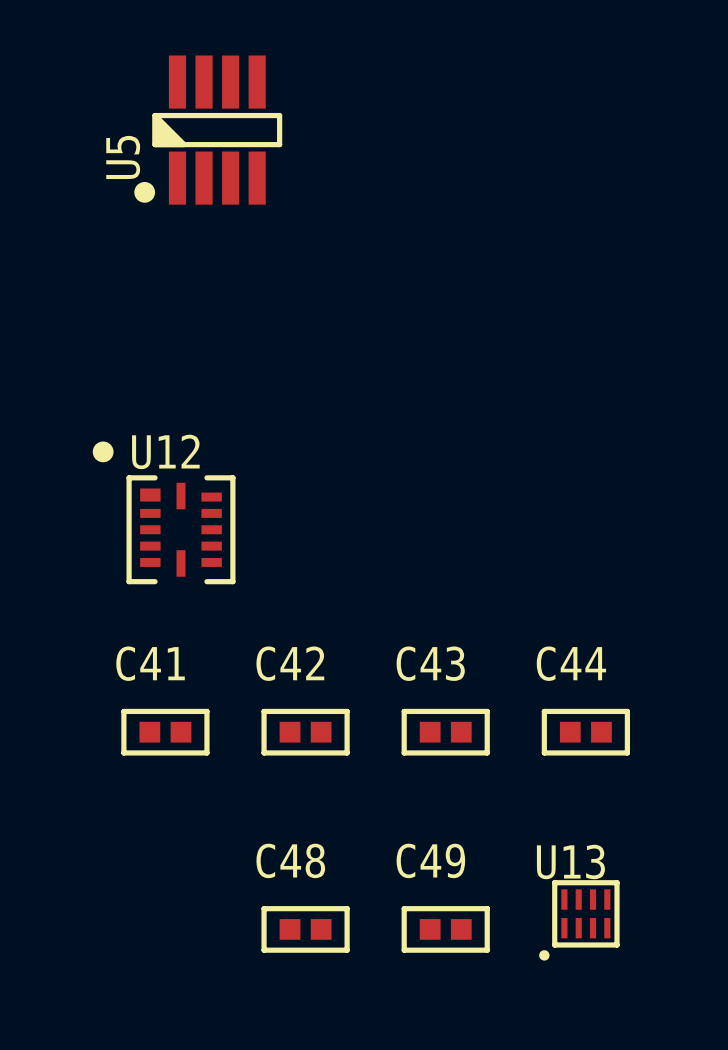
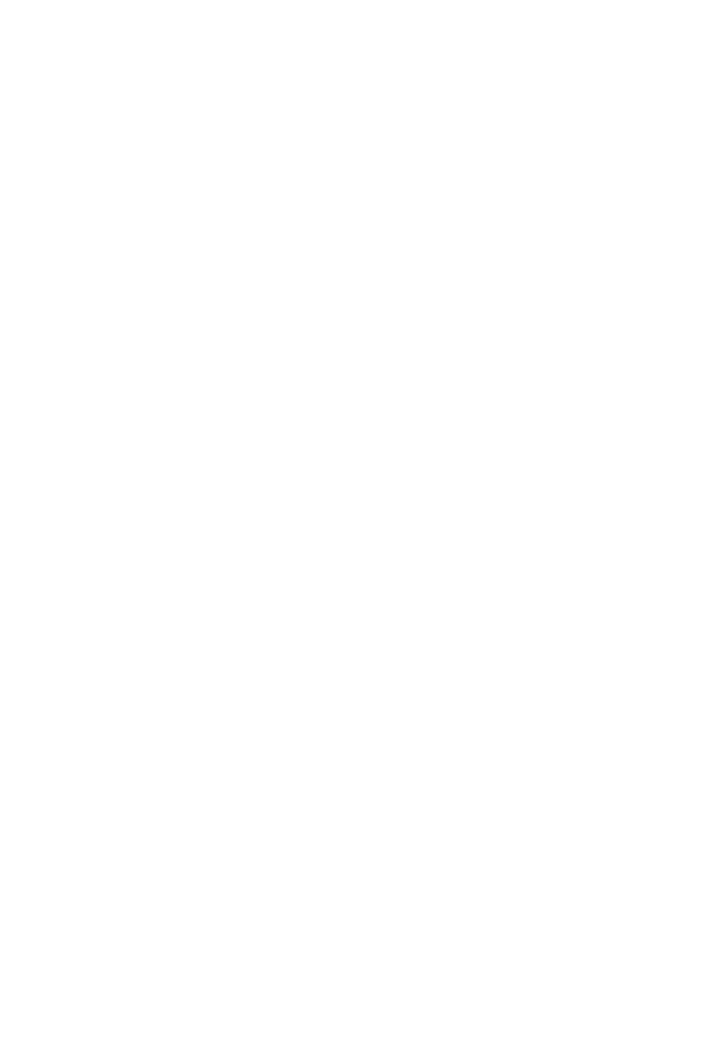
U5: (208, 130) -> none
U12: (164, 512) -> none
C41: (165, 732) -> none
C42: (305, 732) -> none
C43: (445, 732) -> none
C44: (585, 732) -> none
U13: (579, 920) -> none
C48: (305, 929) -> none
C49: (445, 929) -> none

